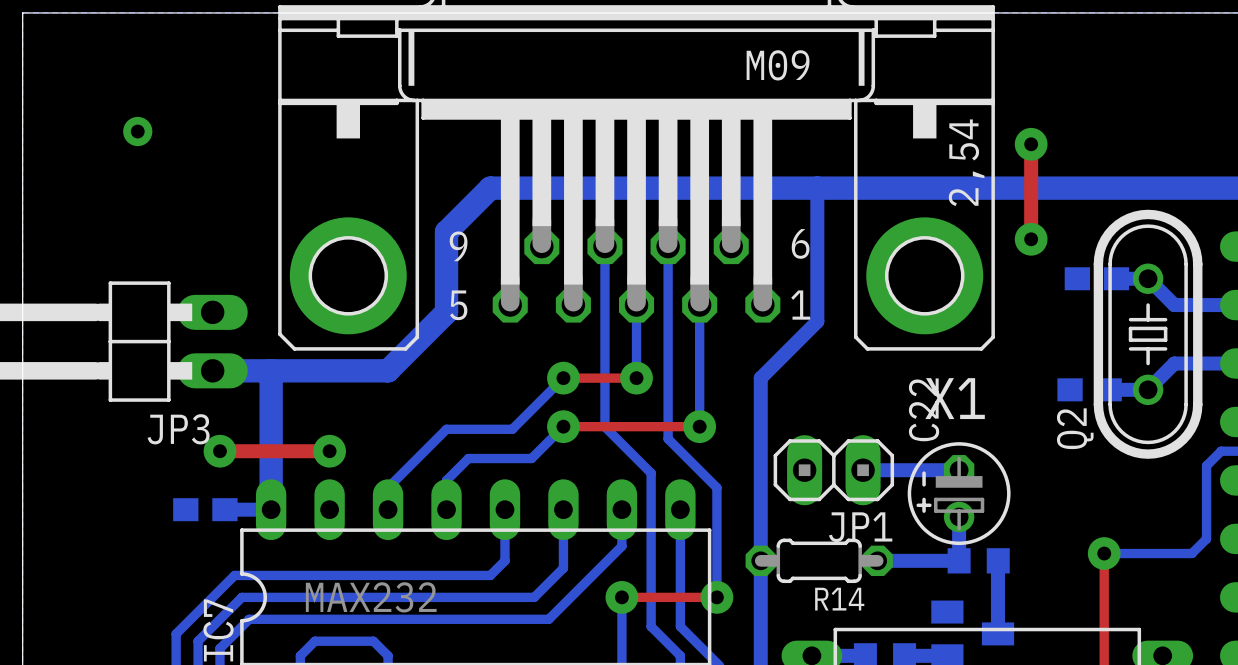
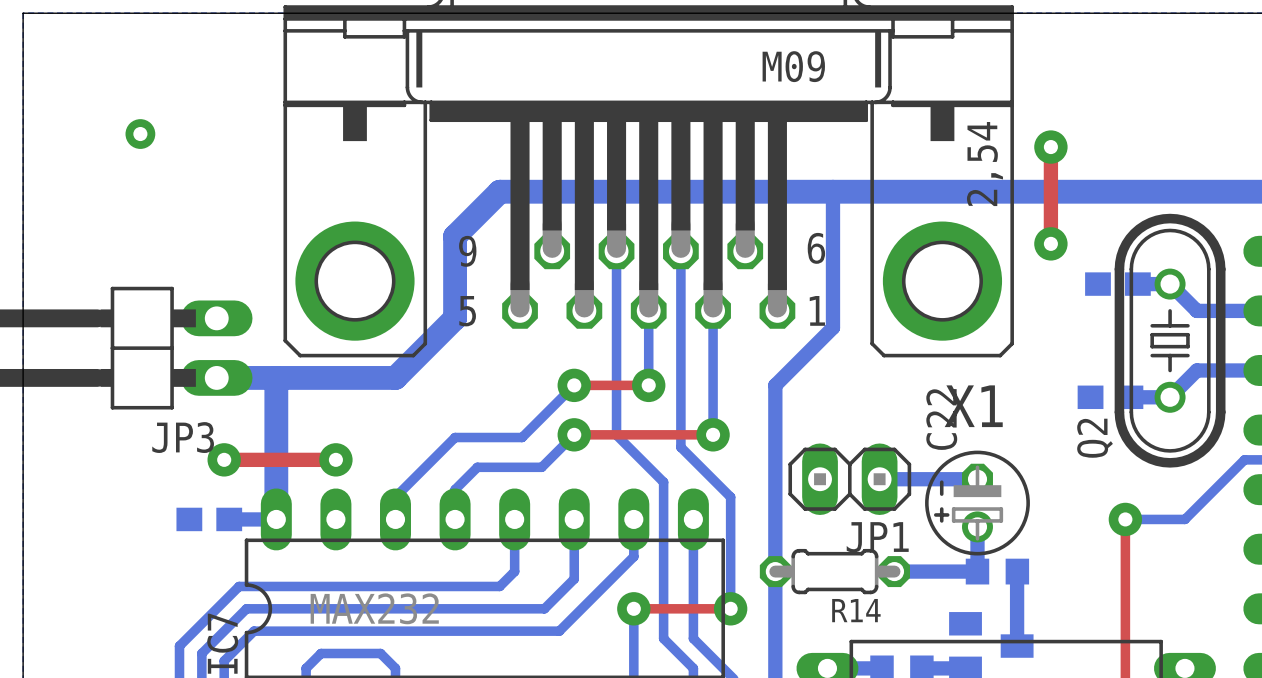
bottom track: (1206, 465) (1206, 538) (1191, 553) (1104, 553) -> (1229, 474) (1184, 519) (1125, 519)
top track: none -> (1125, 519) (1125, 564)
via position: (1104, 553) -> (1125, 519)

